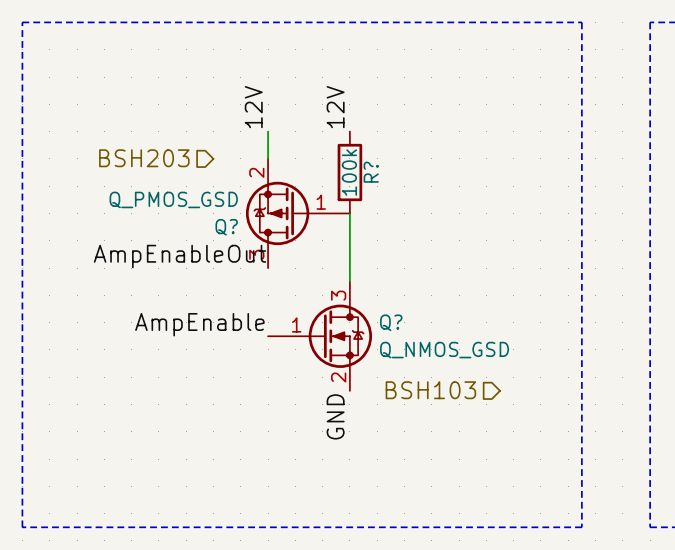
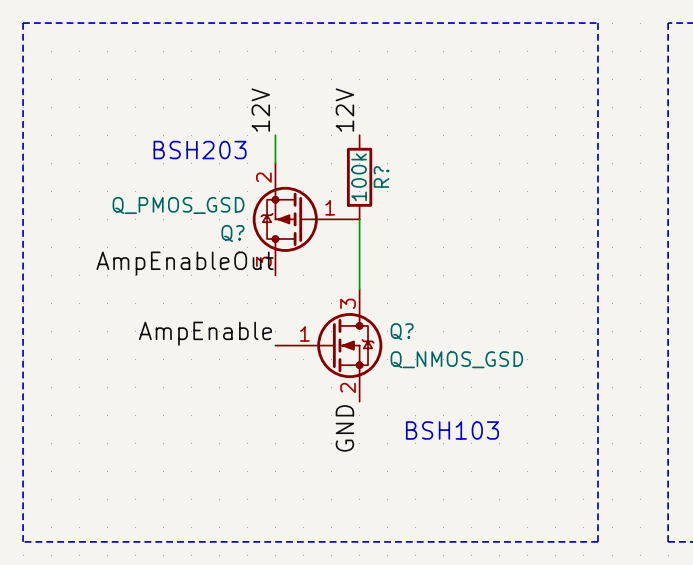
text: none -> BSH203 (200, 150)
hierarchical label: BSH203 (144, 158) -> none
hierarchical label: BSH103 (430, 390) -> none
text: none -> BSH103 (452, 430)

